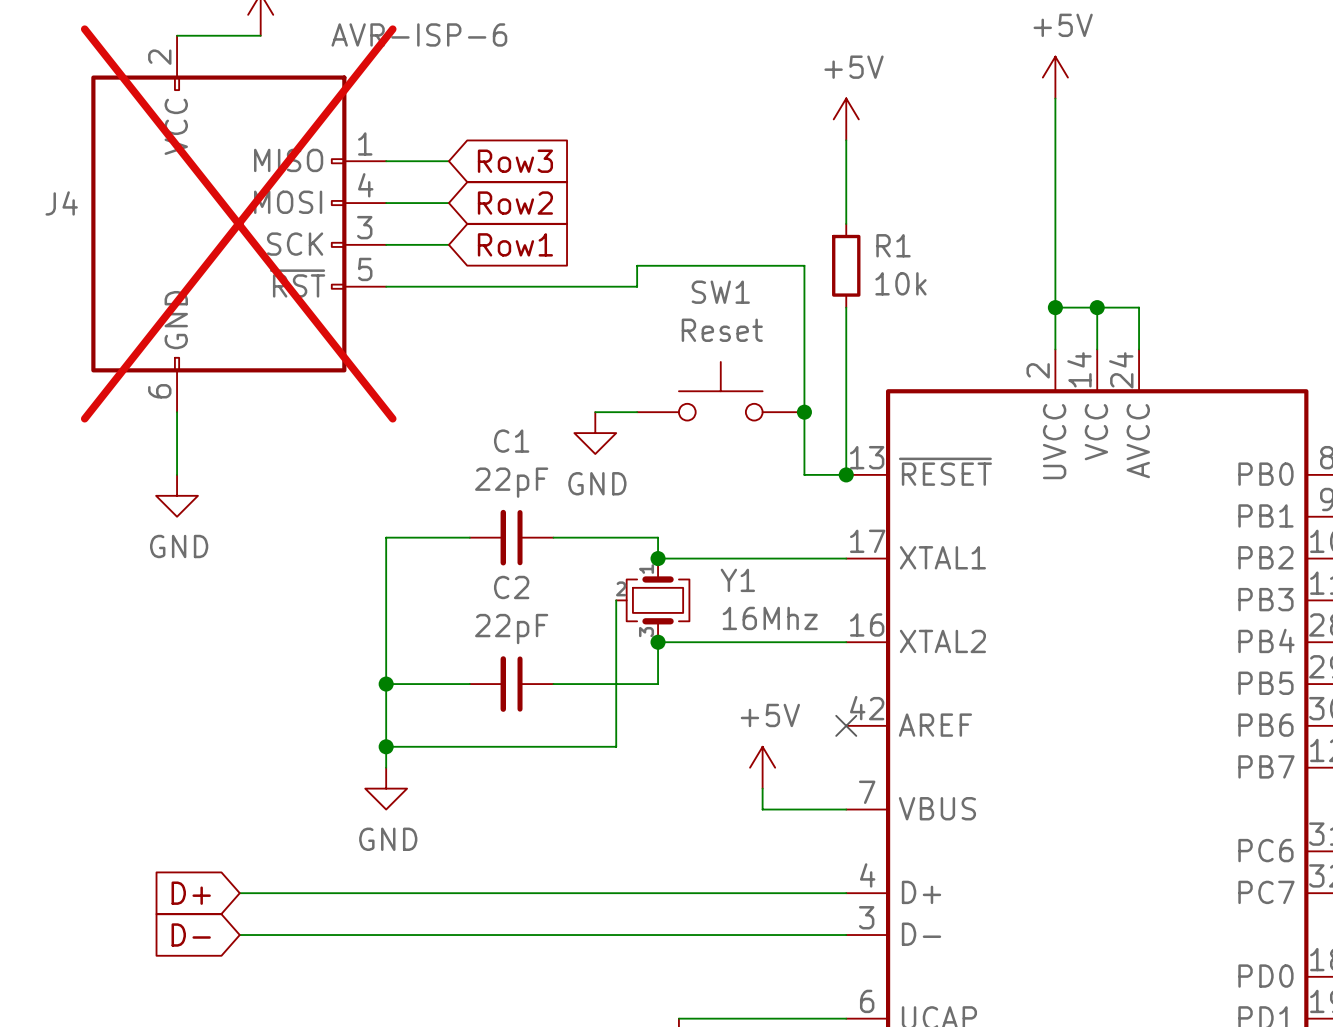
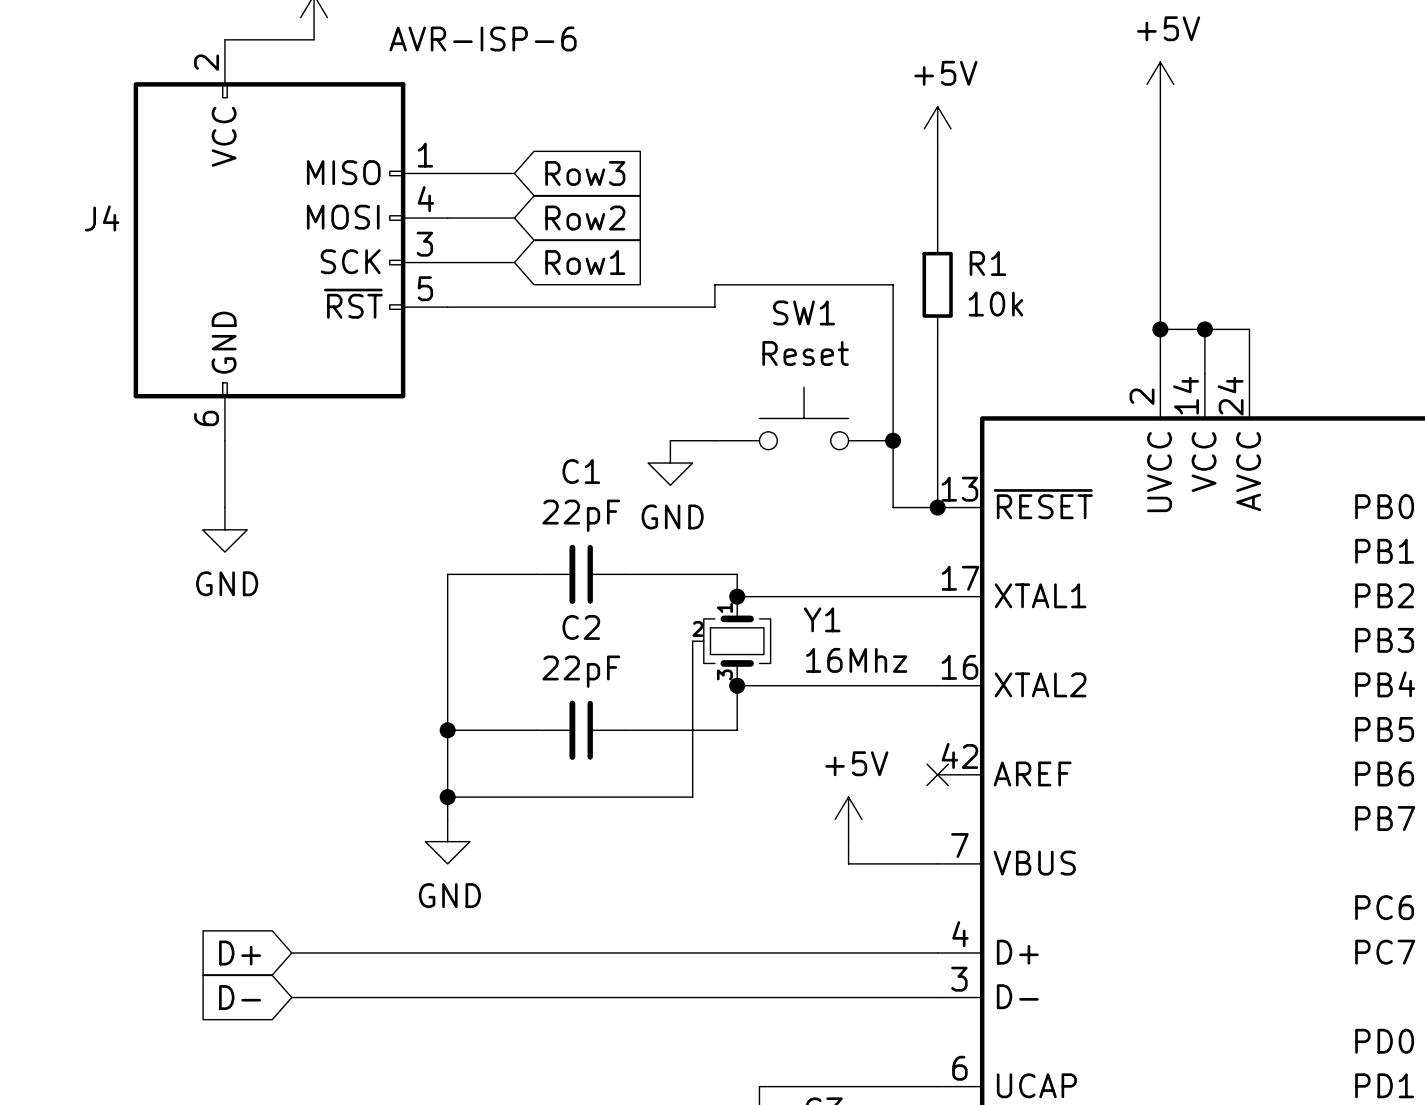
J4 do-not-place cross: (238, 223) -> none

